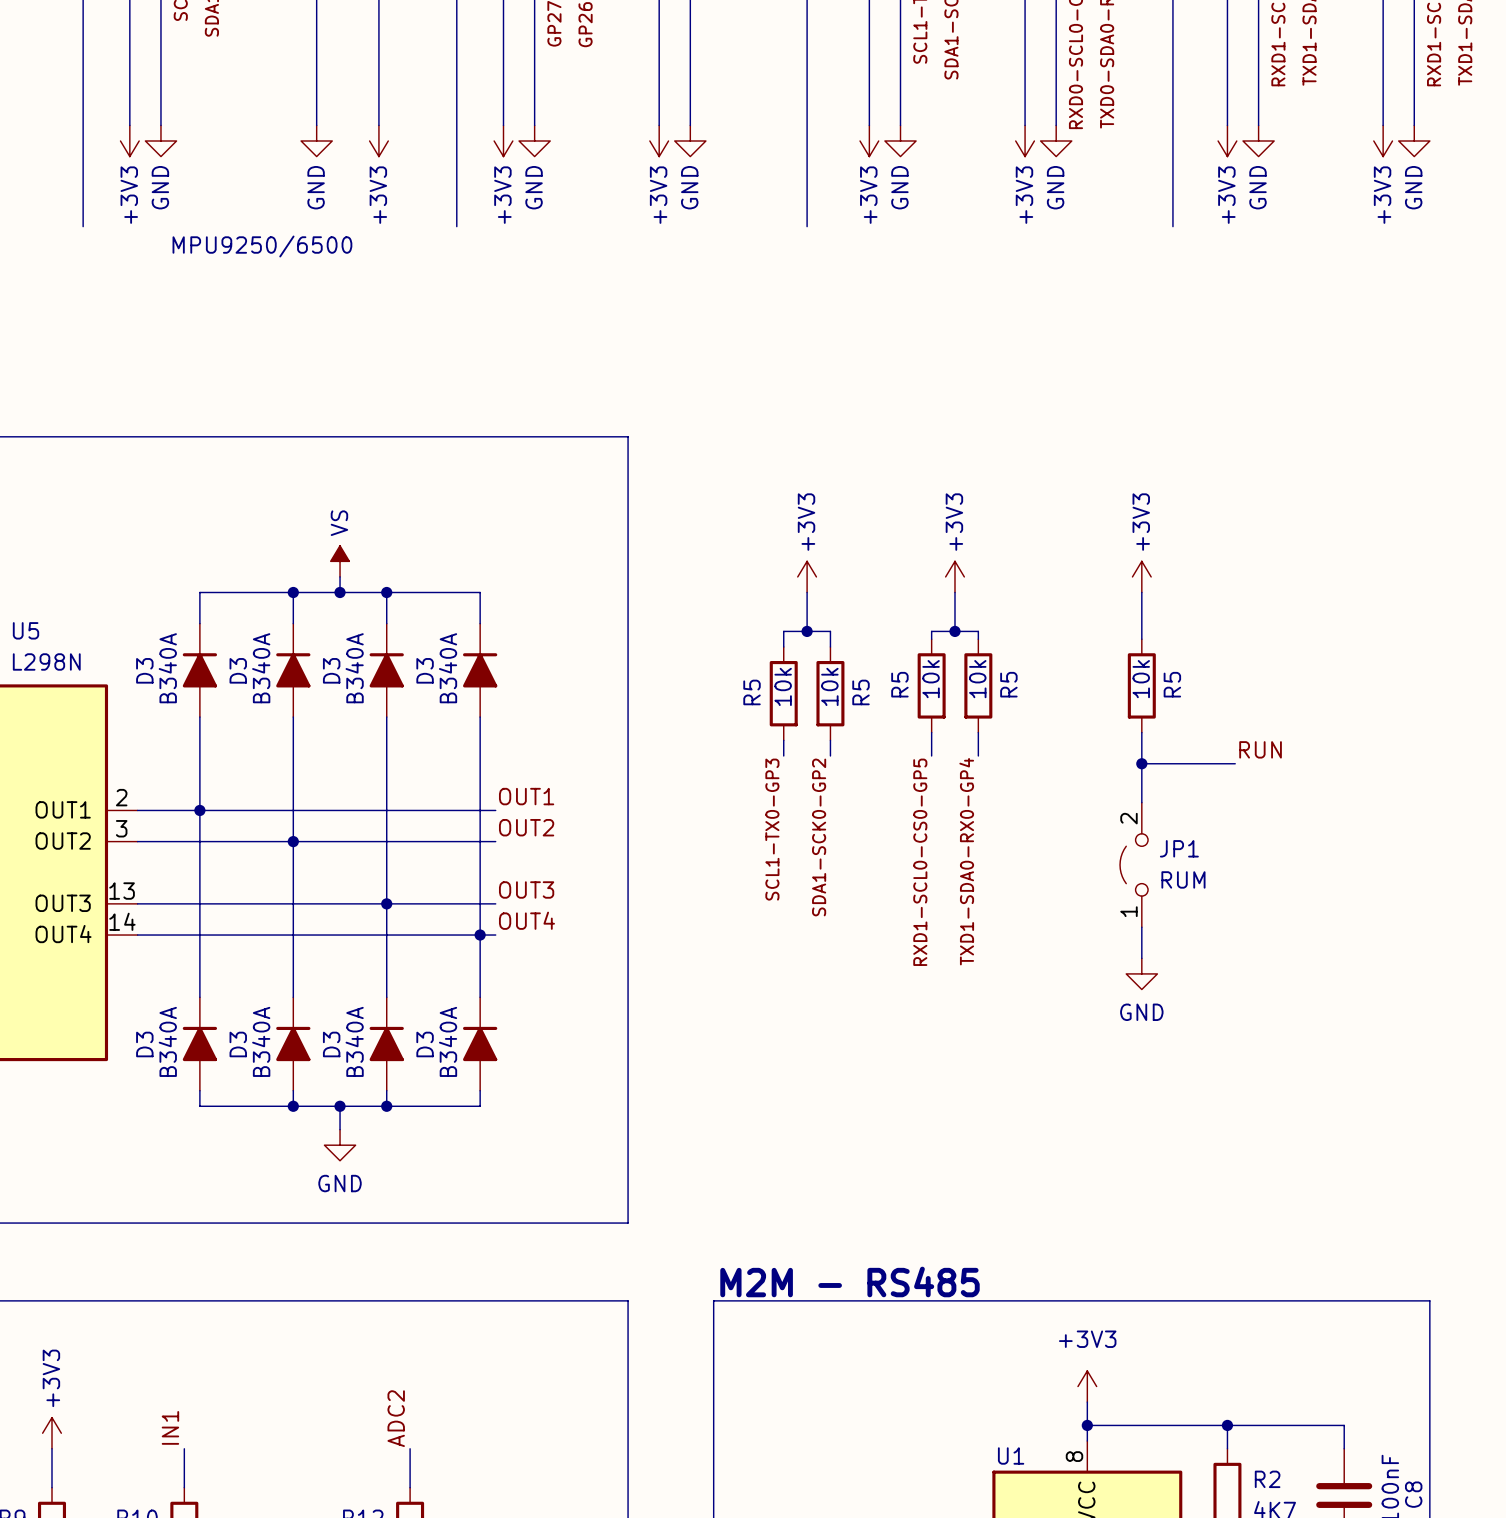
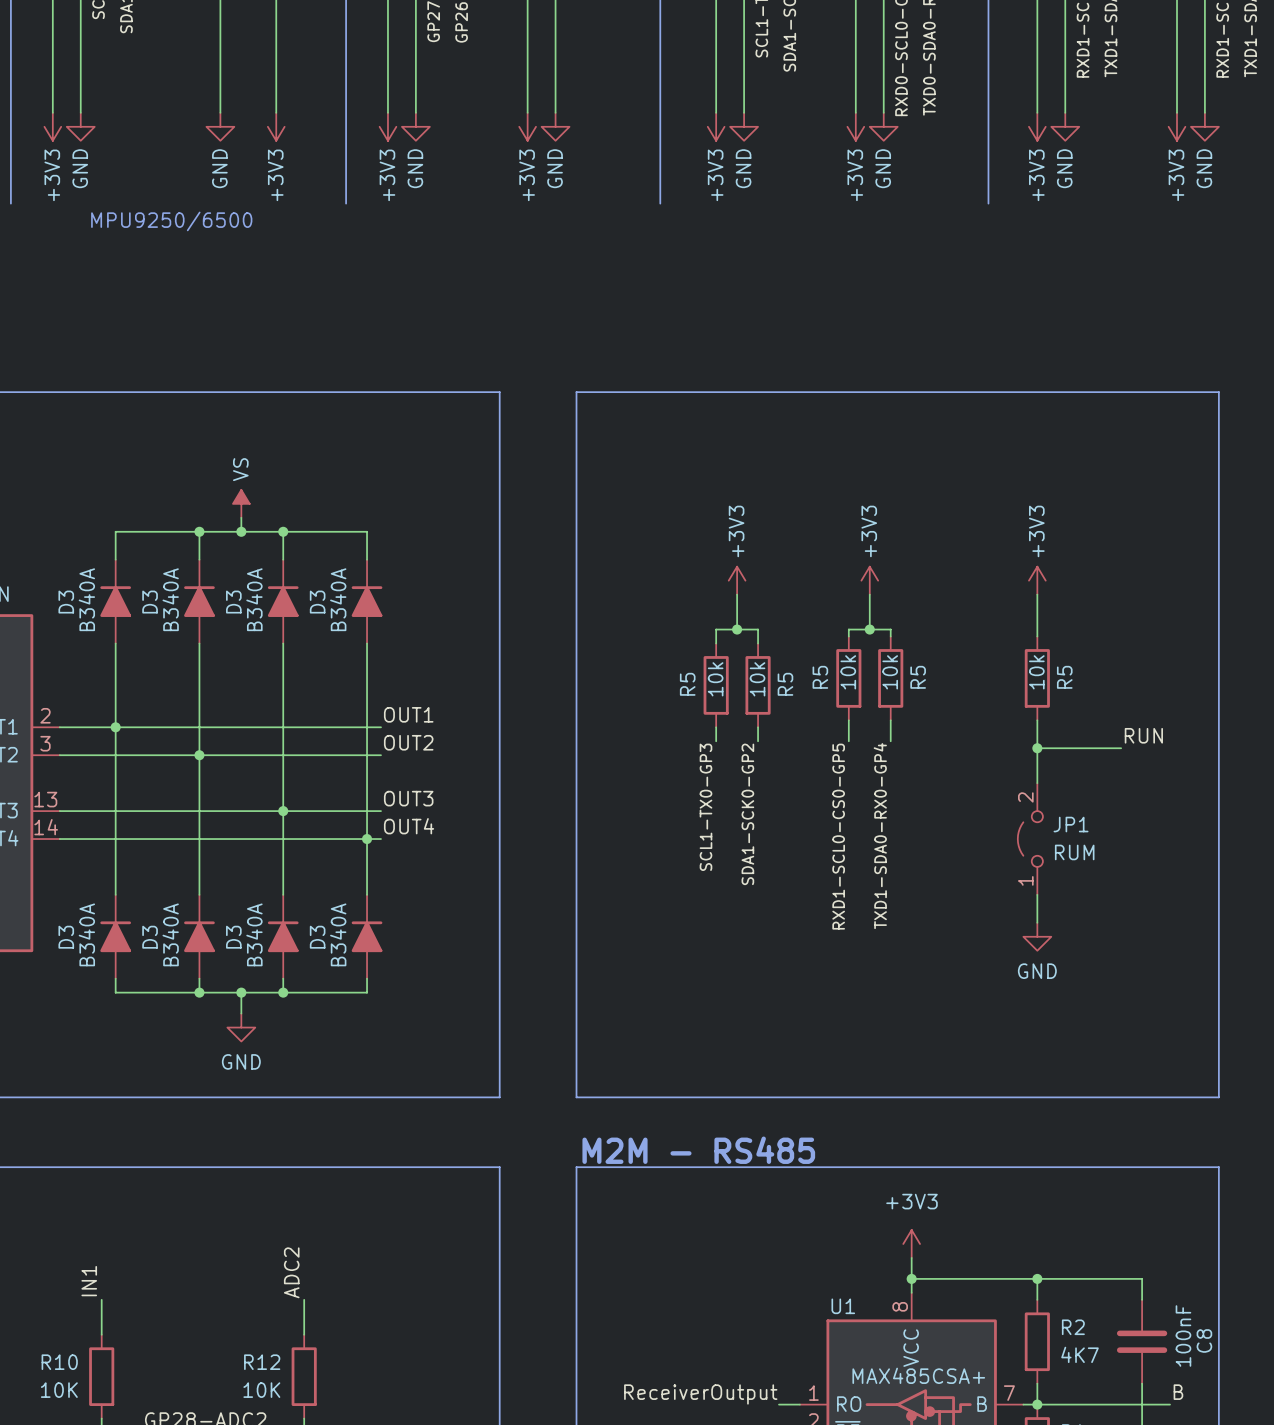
line: none -> (576, 392) (1218, 392) (1218, 1097) (576, 1097) (576, 392)
power symbol: +3V3 (807, 576) -> none
power symbol: +3V3 (954, 576) -> none
power symbol: +3V3 (1141, 576) -> none
wire: (807, 592) (807, 631) -> (737, 594) (737, 629)
wire: (954, 592) (954, 631) -> (869, 594) (869, 629)
wire: (1141, 592) (1141, 639) -> (1037, 594) (1037, 636)
junction: (807, 631) -> none
junction: (954, 631) -> none
wire: (931, 639) (931, 631) (978, 631) (978, 639) -> (848, 636) (848, 629) (890, 629) (890, 636)
wire: (783, 646) (783, 631) (830, 631) (830, 646) -> (716, 643) (716, 629) (758, 629) (758, 643)
power symbol: none -> +3V3 (737, 580)
power symbol: none -> +3V3 (869, 580)
power symbol: none -> +3V3 (1037, 580)
R5: 10k (931, 685) -> none
R5: 10k (978, 685) -> none
R5: 10k (1141, 685) -> none
R5: 10k (783, 693) -> none
R5: 10k (830, 693) -> none
junction: none -> (737, 629)
junction: none -> (869, 629)
wire: (931, 732) (931, 755) -> (848, 720) (848, 741)
wire: (978, 732) (978, 755) -> (890, 720) (890, 741)
wire: (1141, 732) (1141, 802) -> (1037, 720) (1037, 783)
wire: (783, 740) (783, 755) -> (716, 727) (716, 741)
wire: (830, 740) (830, 755) -> (758, 727) (758, 741)
label position: RUN (1260, 749) -> RUN (1143, 735)
R5: none -> 10k (848, 678)
R5: none -> 10k (890, 678)
R5: none -> 10k (1037, 678)
R5: none -> 10k (716, 685)
R5: none -> 10k (758, 685)
wire: (1141, 763) (1235, 763) -> (1037, 748) (1121, 748)
junction: (1141, 763) -> none
label position: SCL1-TX0-GP3 (772, 829) -> SCL1-TX0-GP3 (705, 807)
junction: none -> (1037, 748)
label position: SDA1-SCK0-GP2 (819, 837) -> SDA1-SCK0-GP2 (747, 814)
label position: TXD1-SDA0-RX0-GP4 (966, 861) -> TXD1-SDA0-RX0-GP4 (880, 836)
label position: RXD1-SCL0-CS0-GP5 (920, 862) -> RXD1-SCL0-CS0-GP5 (838, 836)
JP1 position: (1134, 864) -> (1030, 839)
wire: (1141, 927) (1141, 958) -> (1037, 894) (1037, 922)
power symbol position: GND (1141, 973) -> GND (1037, 936)

